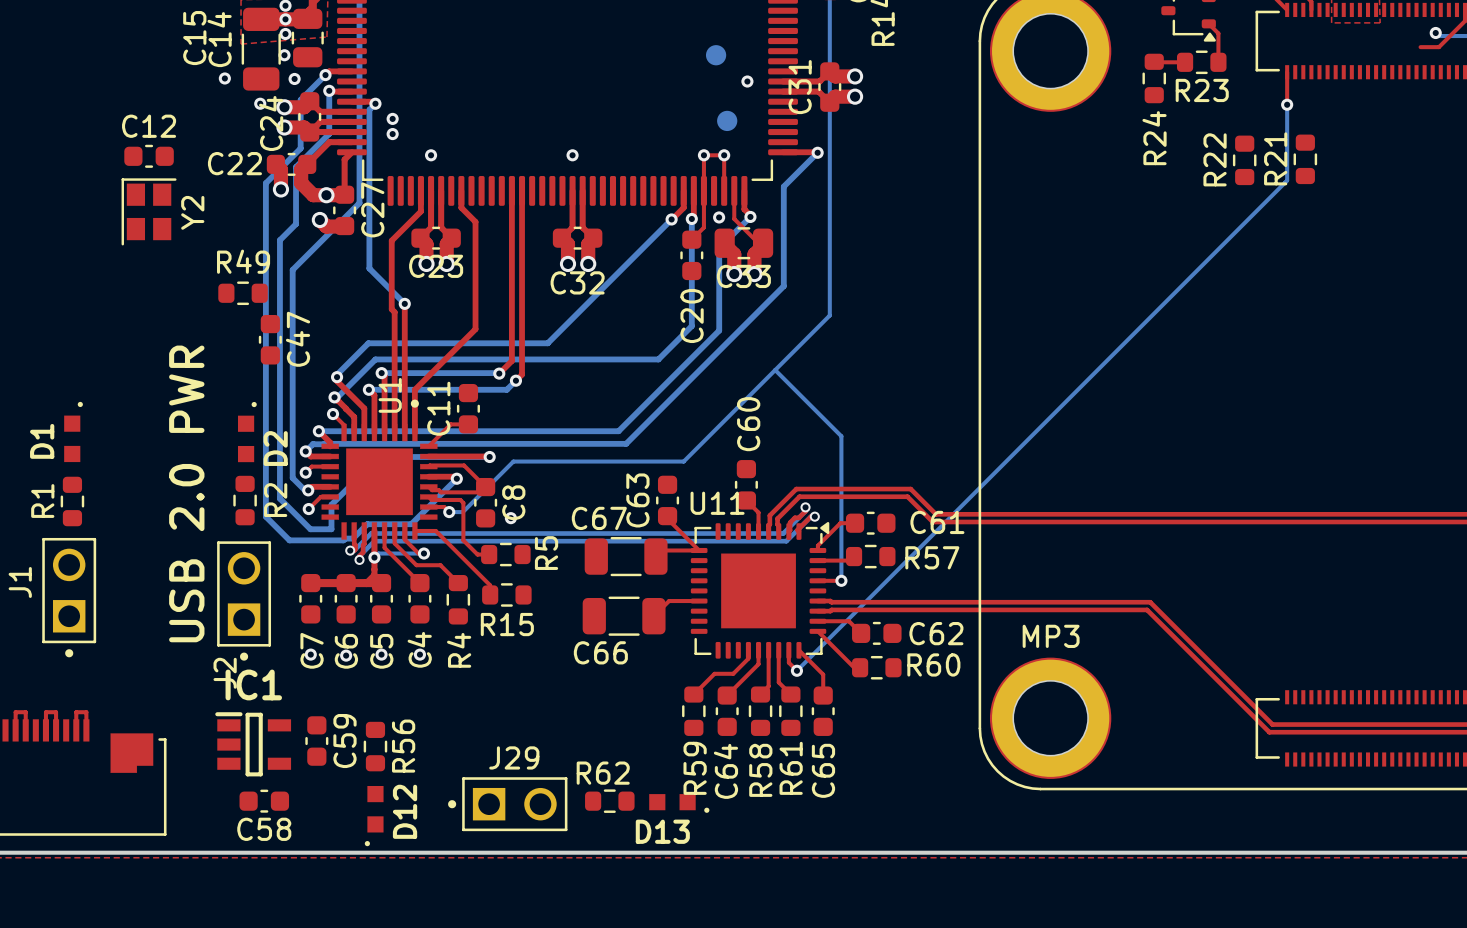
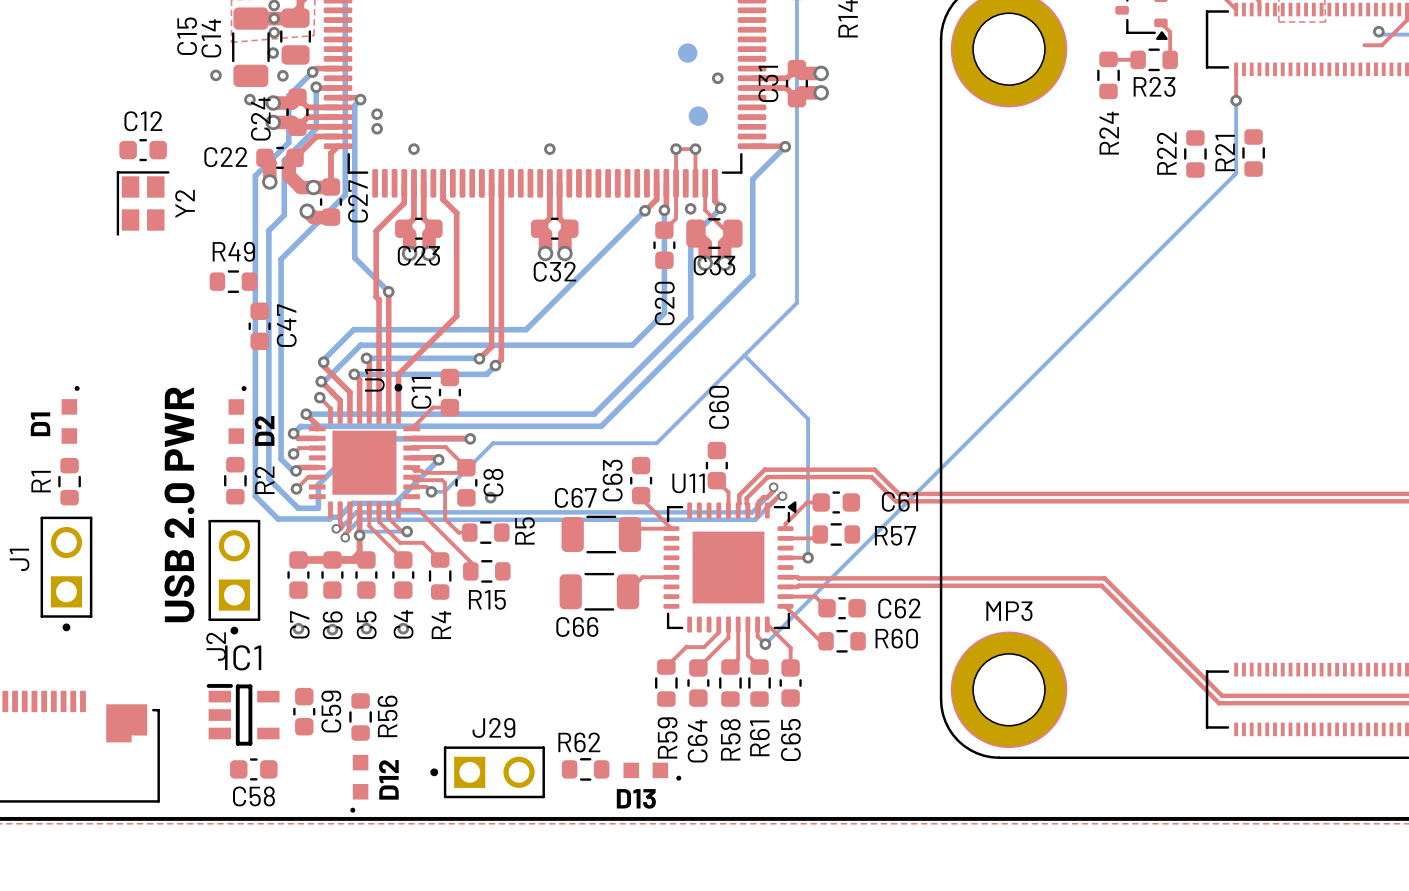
top track: (15, 730) (15, 712) (25, 712) (25, 730) -> none
top track: (45, 730) (45, 712) (56, 712) (56, 730) -> none
top track: (76, 730) (76, 712) (86, 712) (86, 730) -> none

